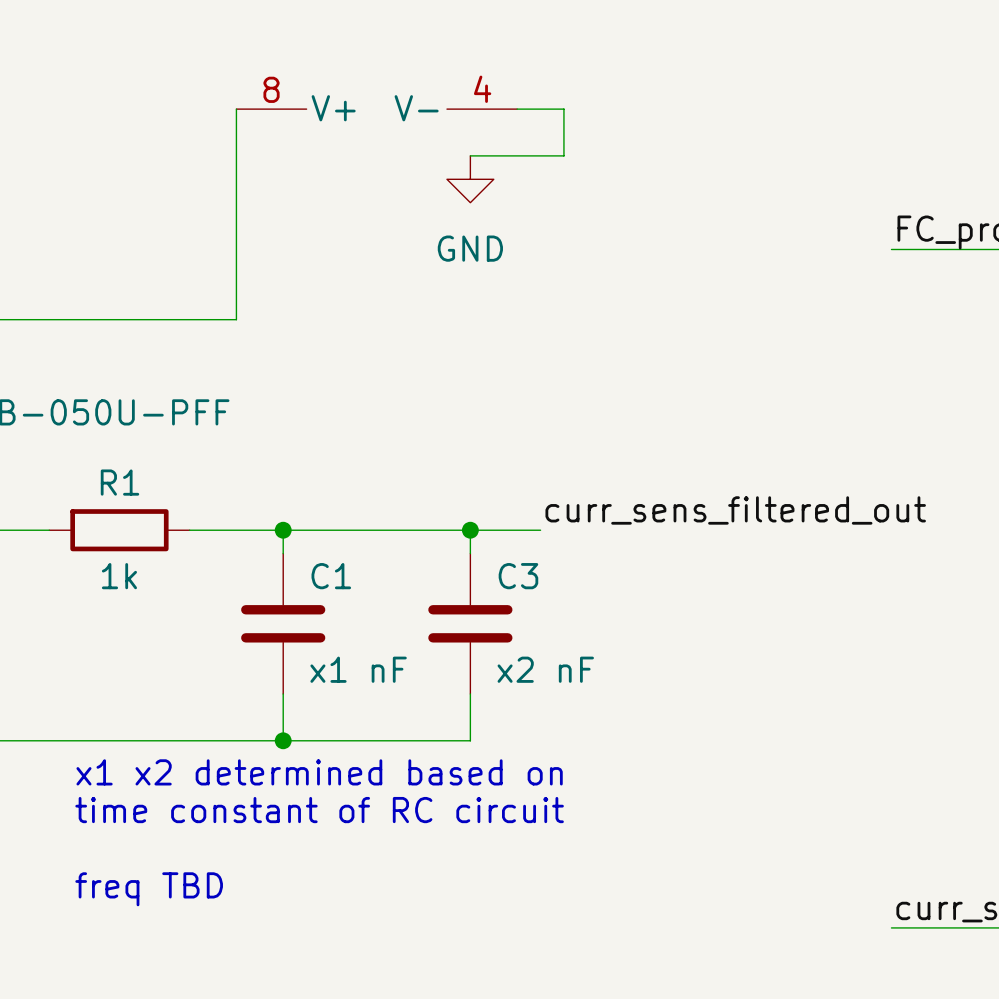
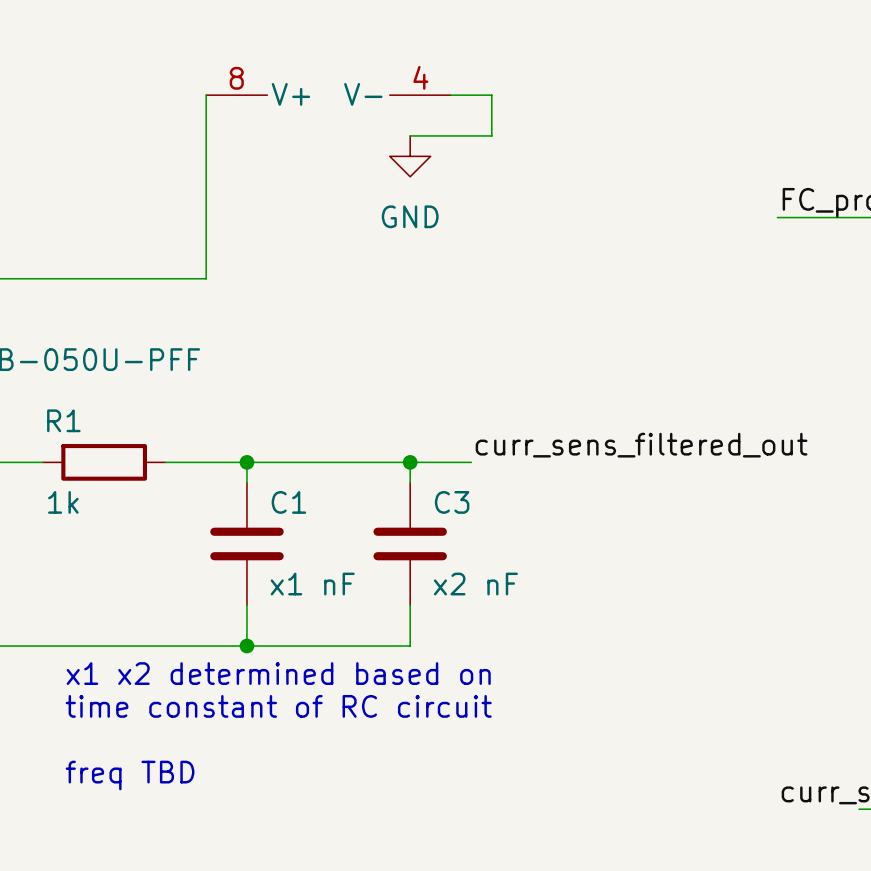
R1 name position: R1 (120, 482) -> R1 (63, 420)
R1 value position: 1k (119, 576) -> 1k (63, 502)
wire: (891, 927) (985, 927) -> none

